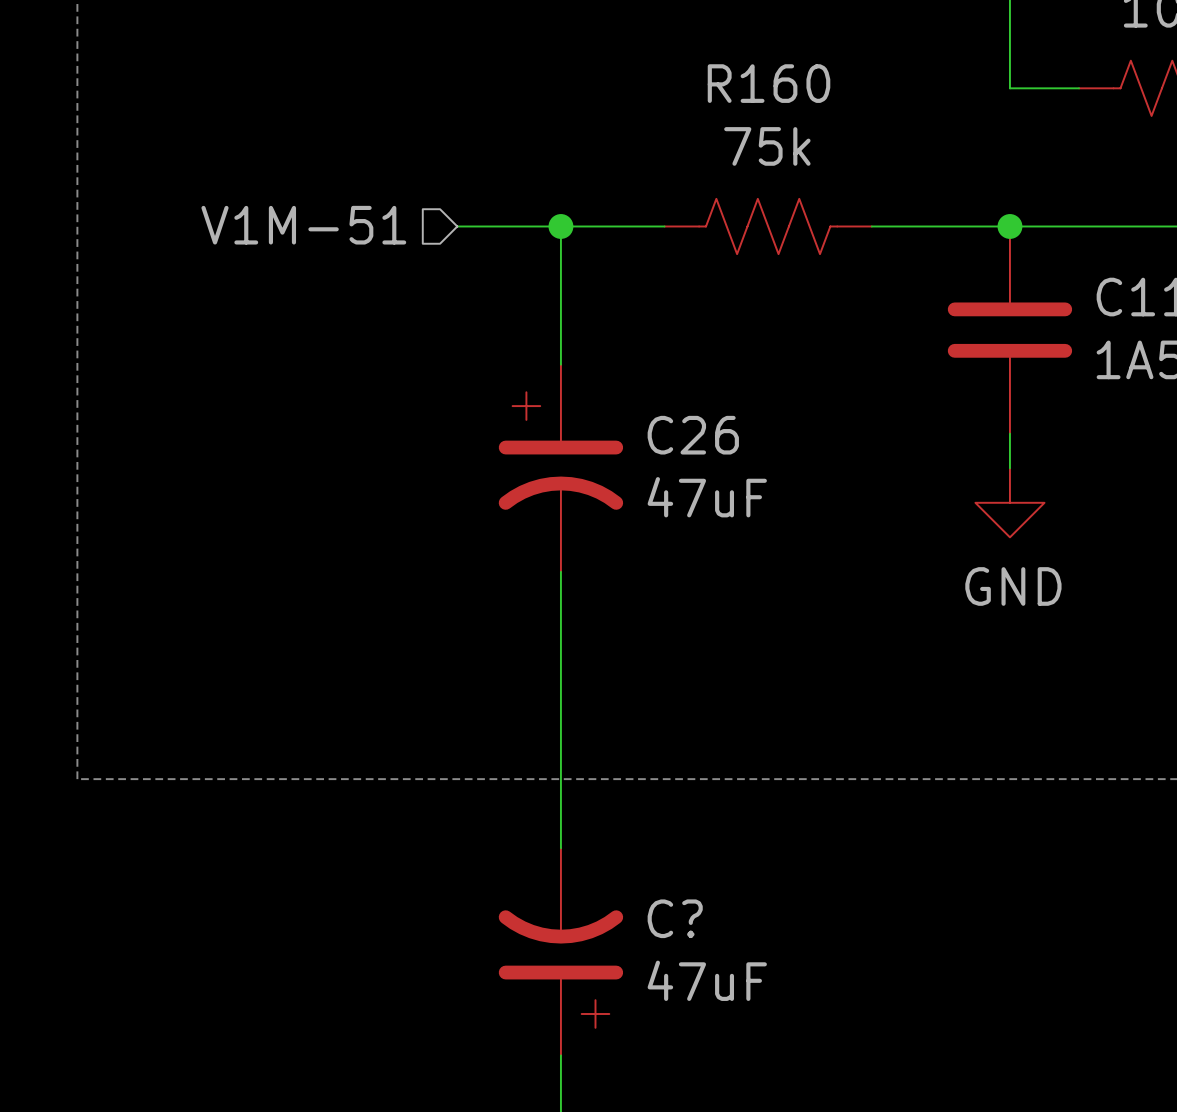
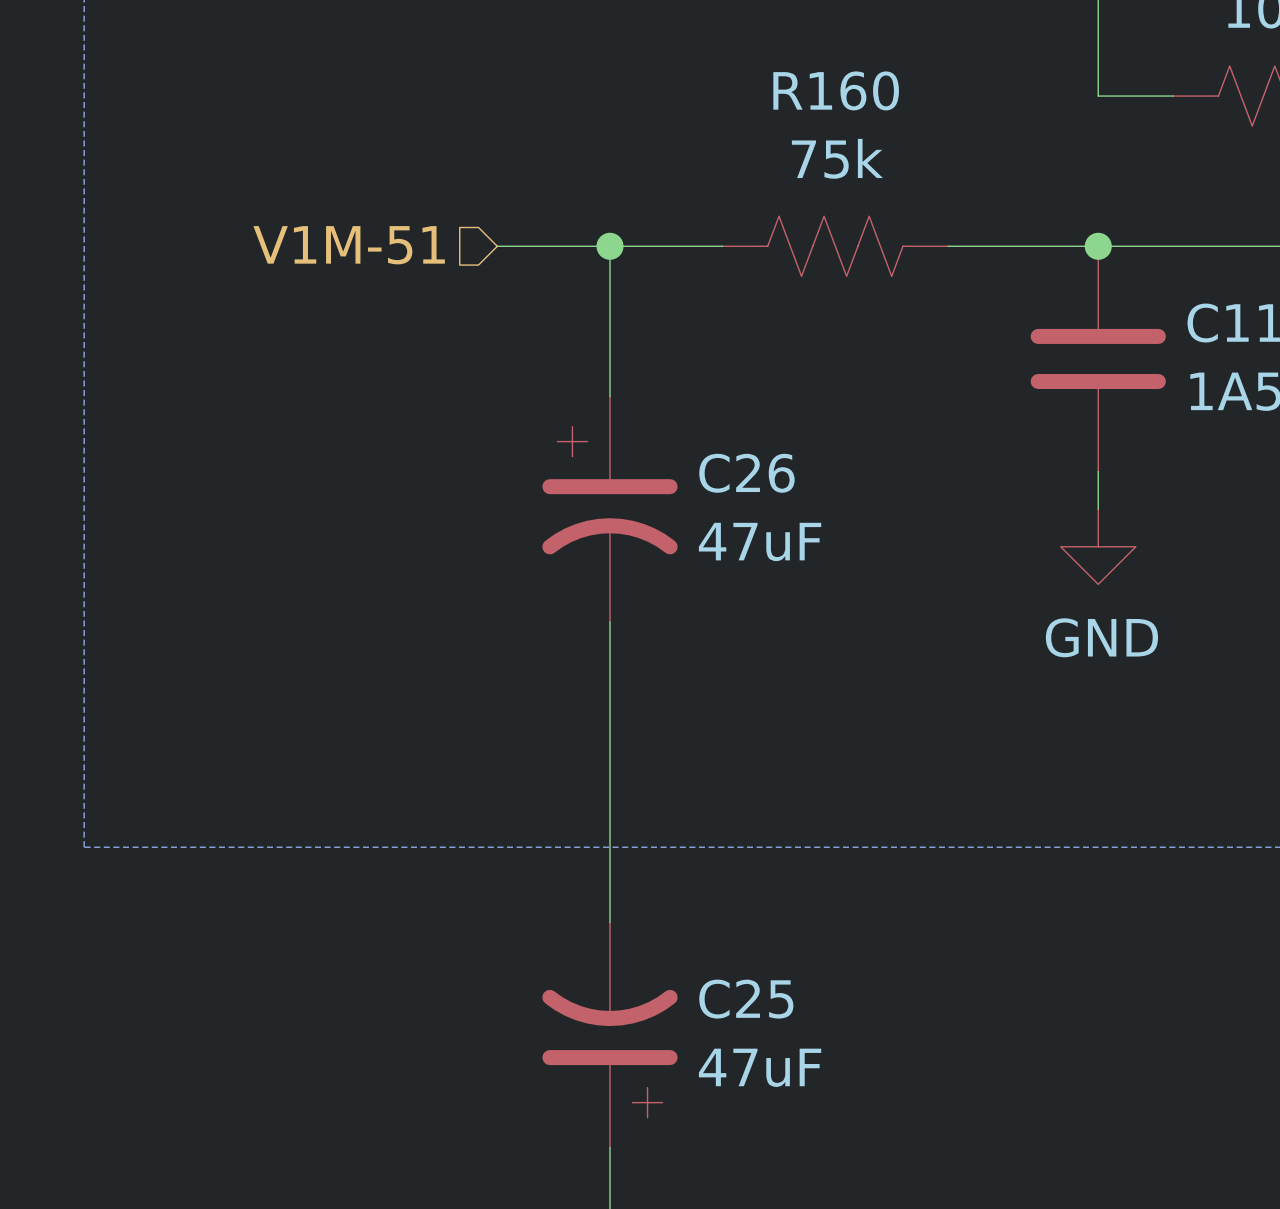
C? name: C? (675, 918) -> C25 (746, 999)

